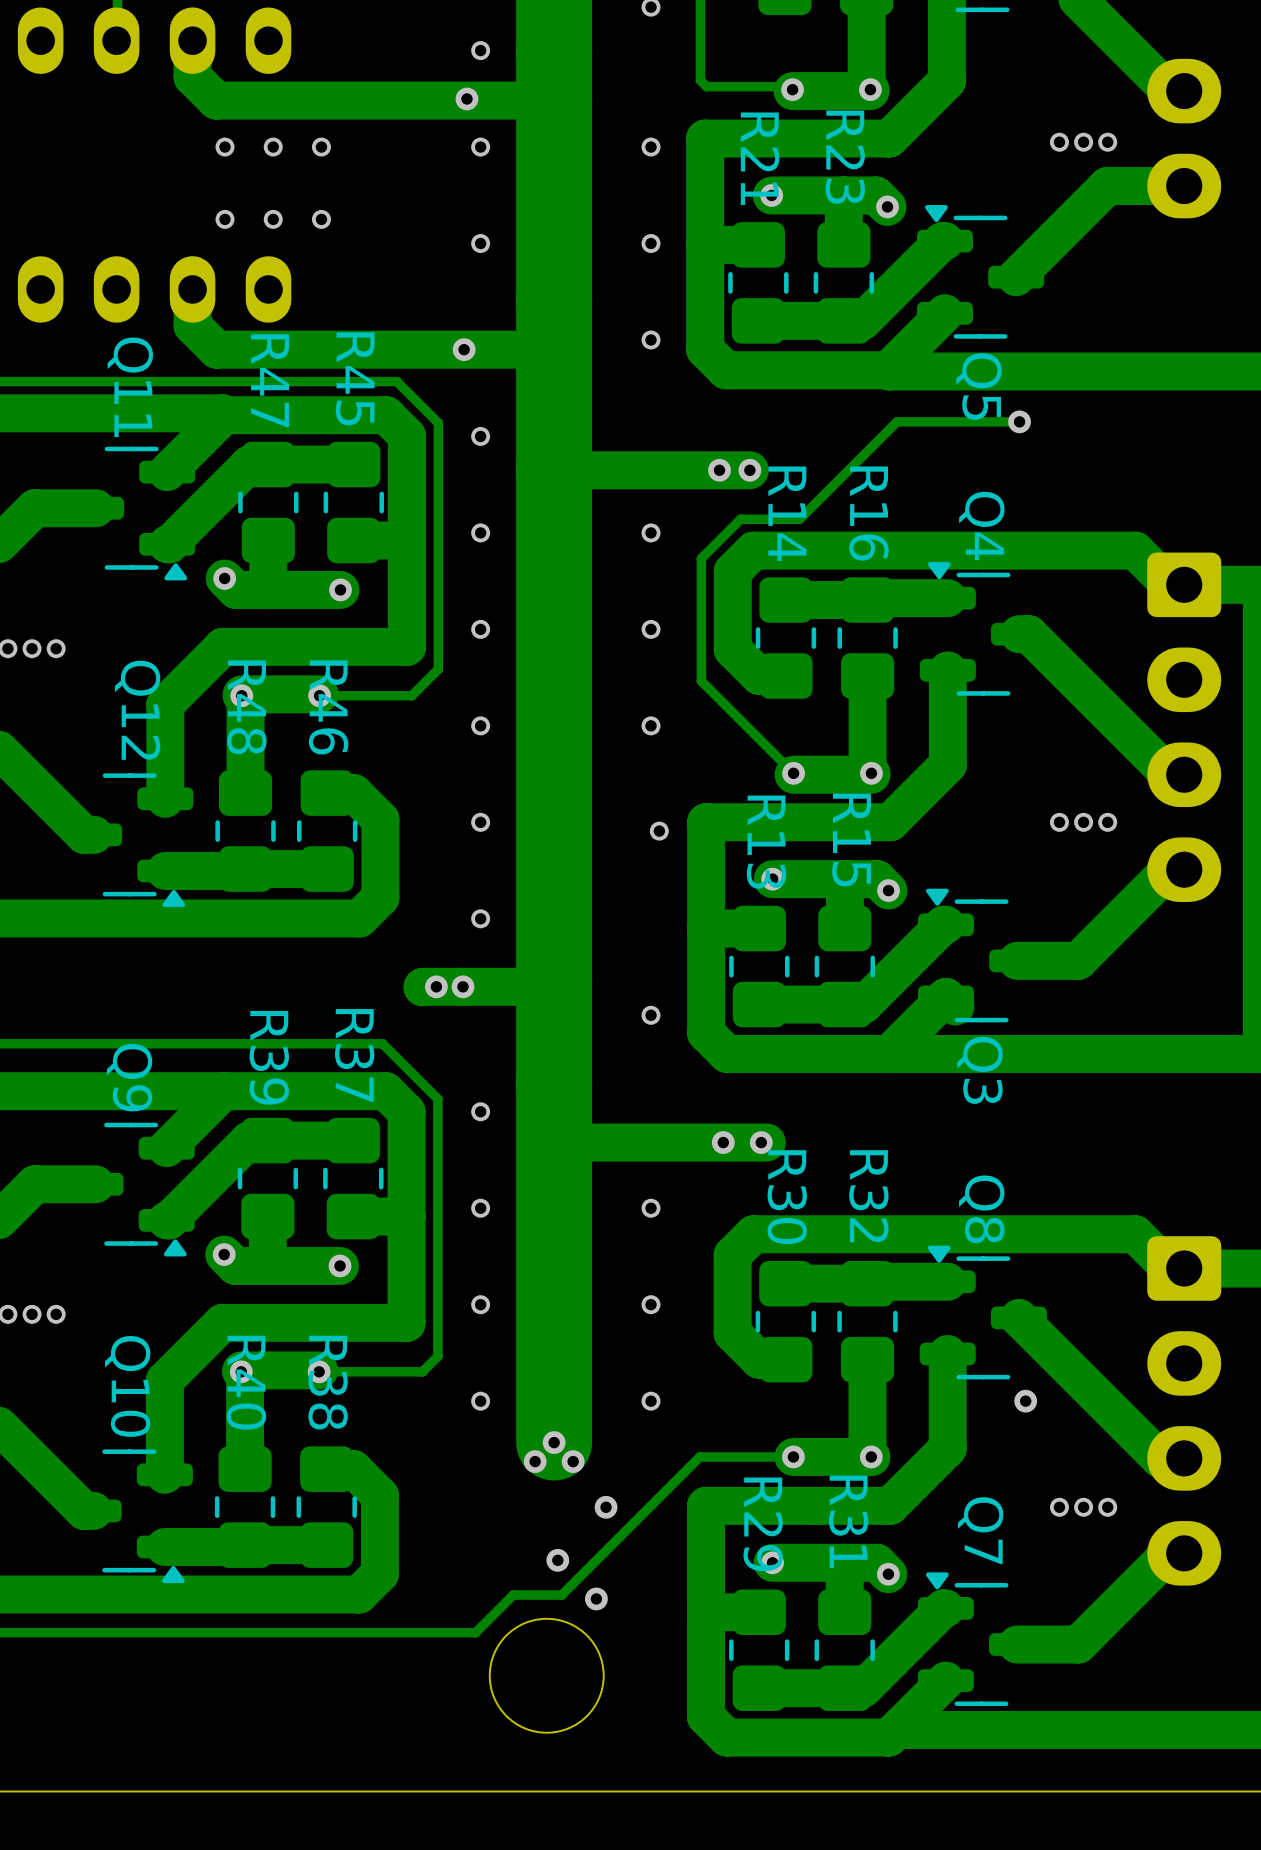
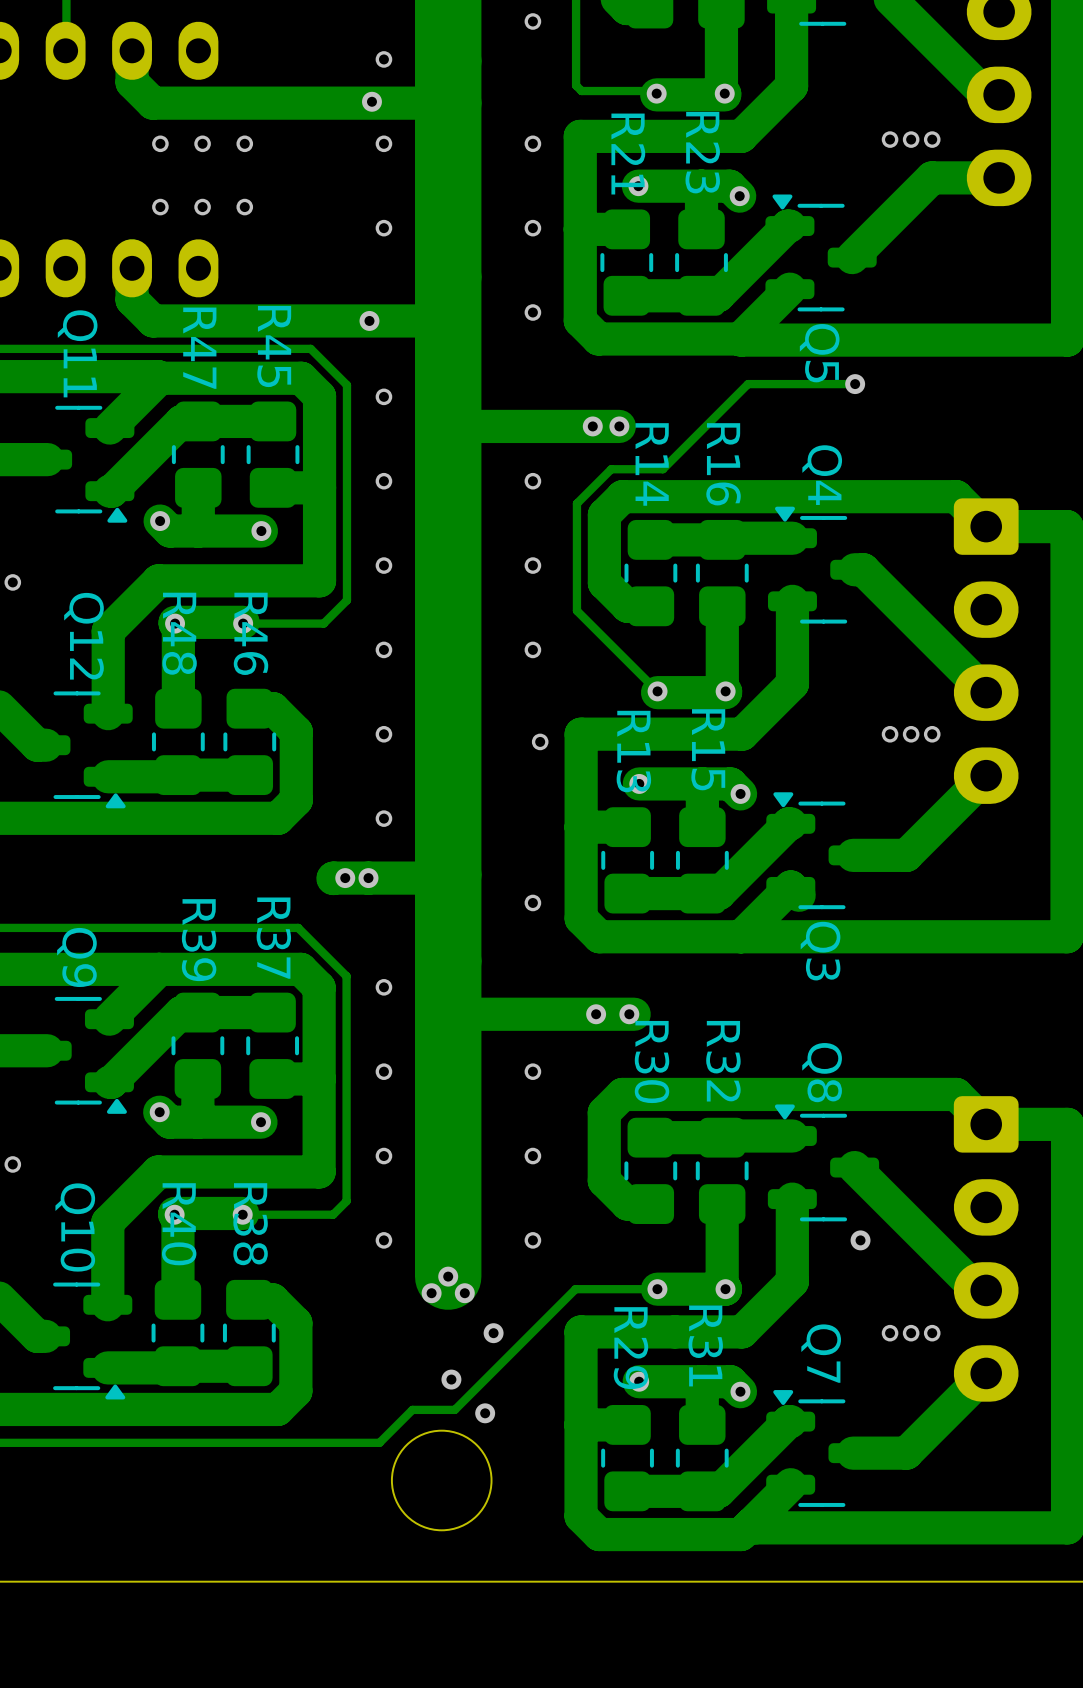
part position: (1184, 727) -> (986, 651)
part position: (1184, 1410) -> (986, 1248)

